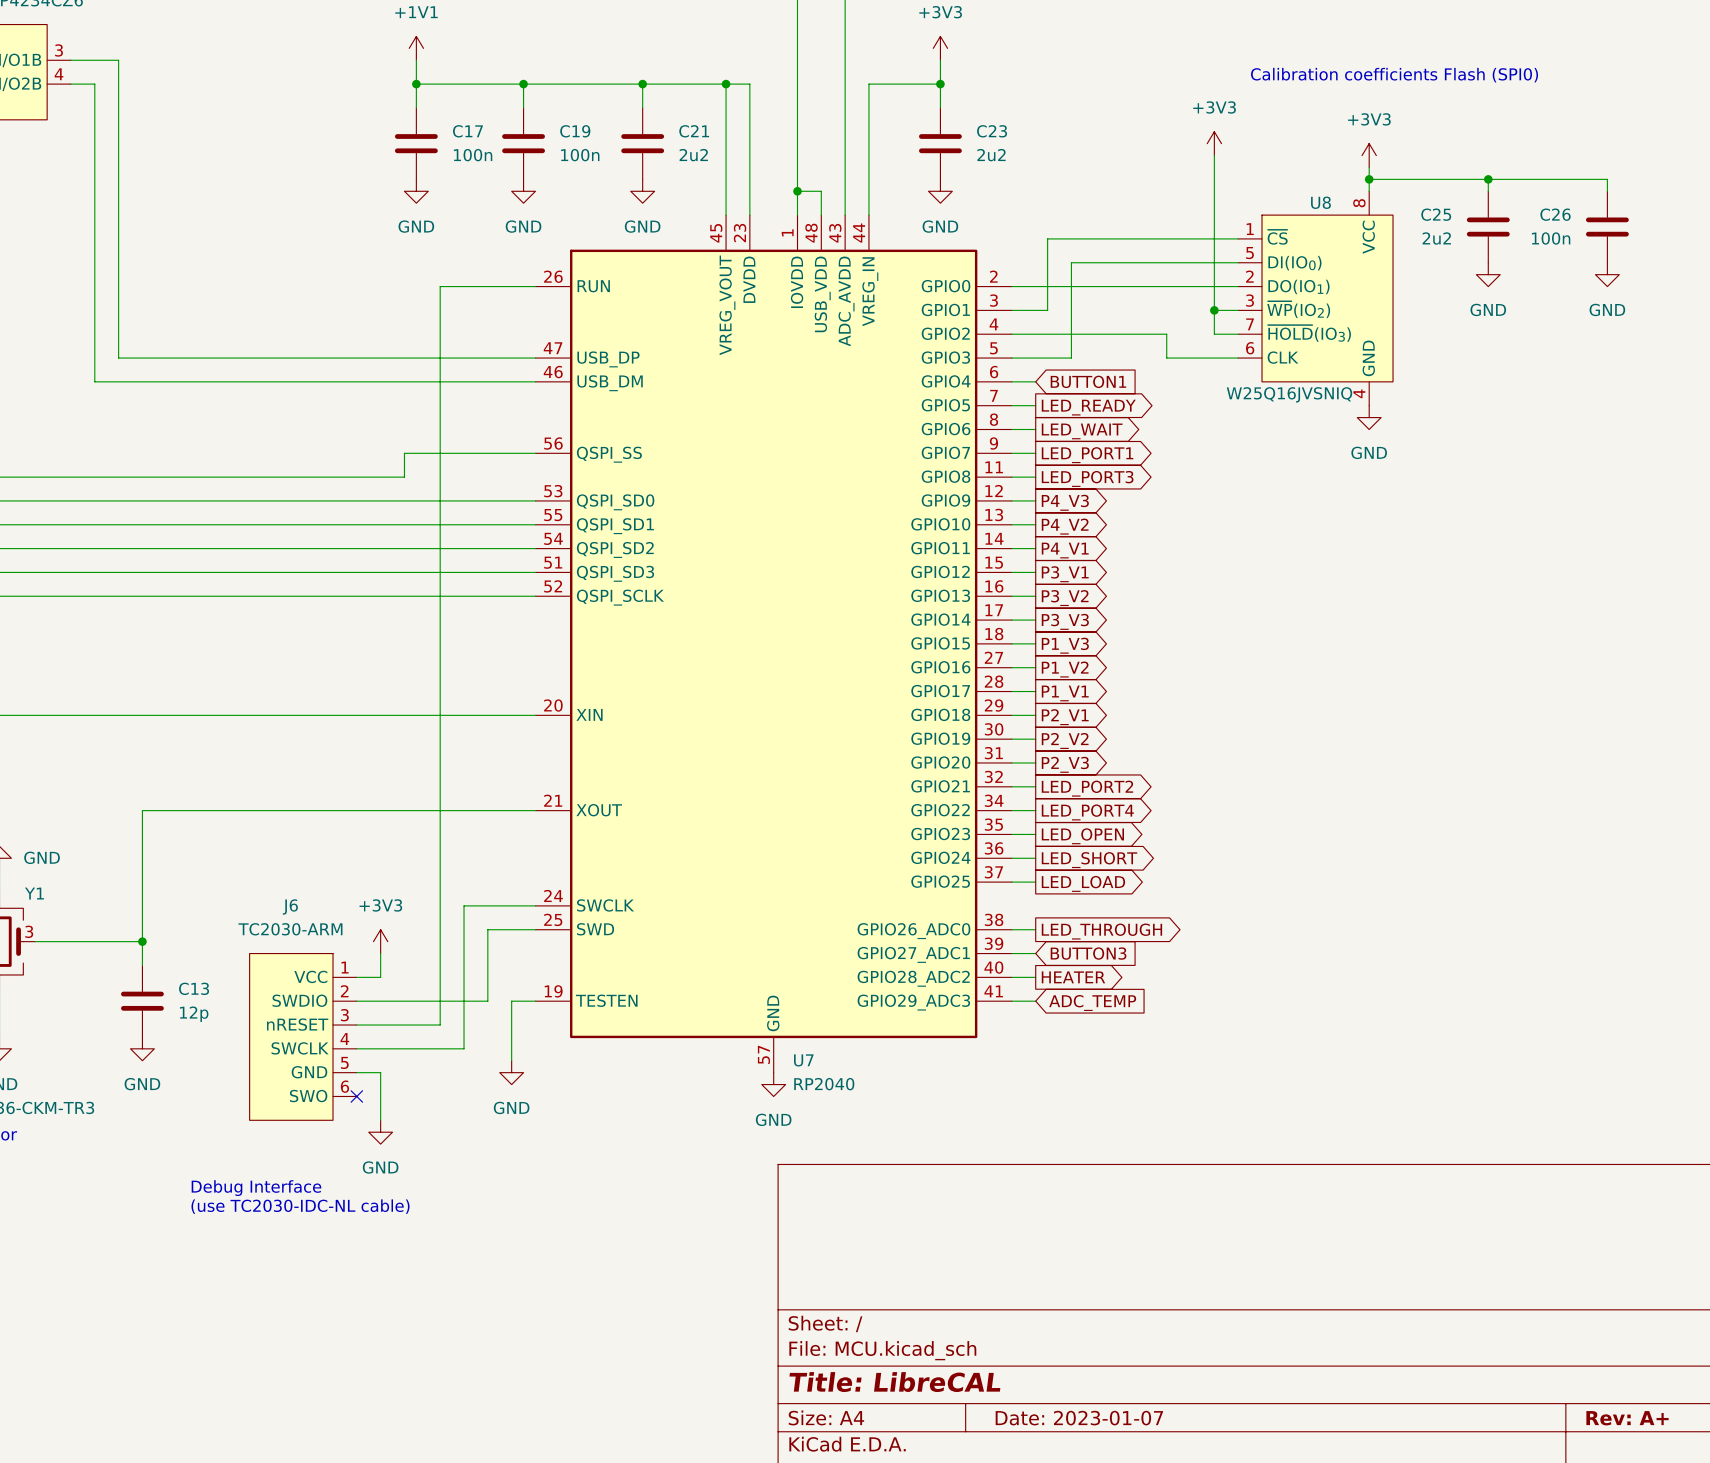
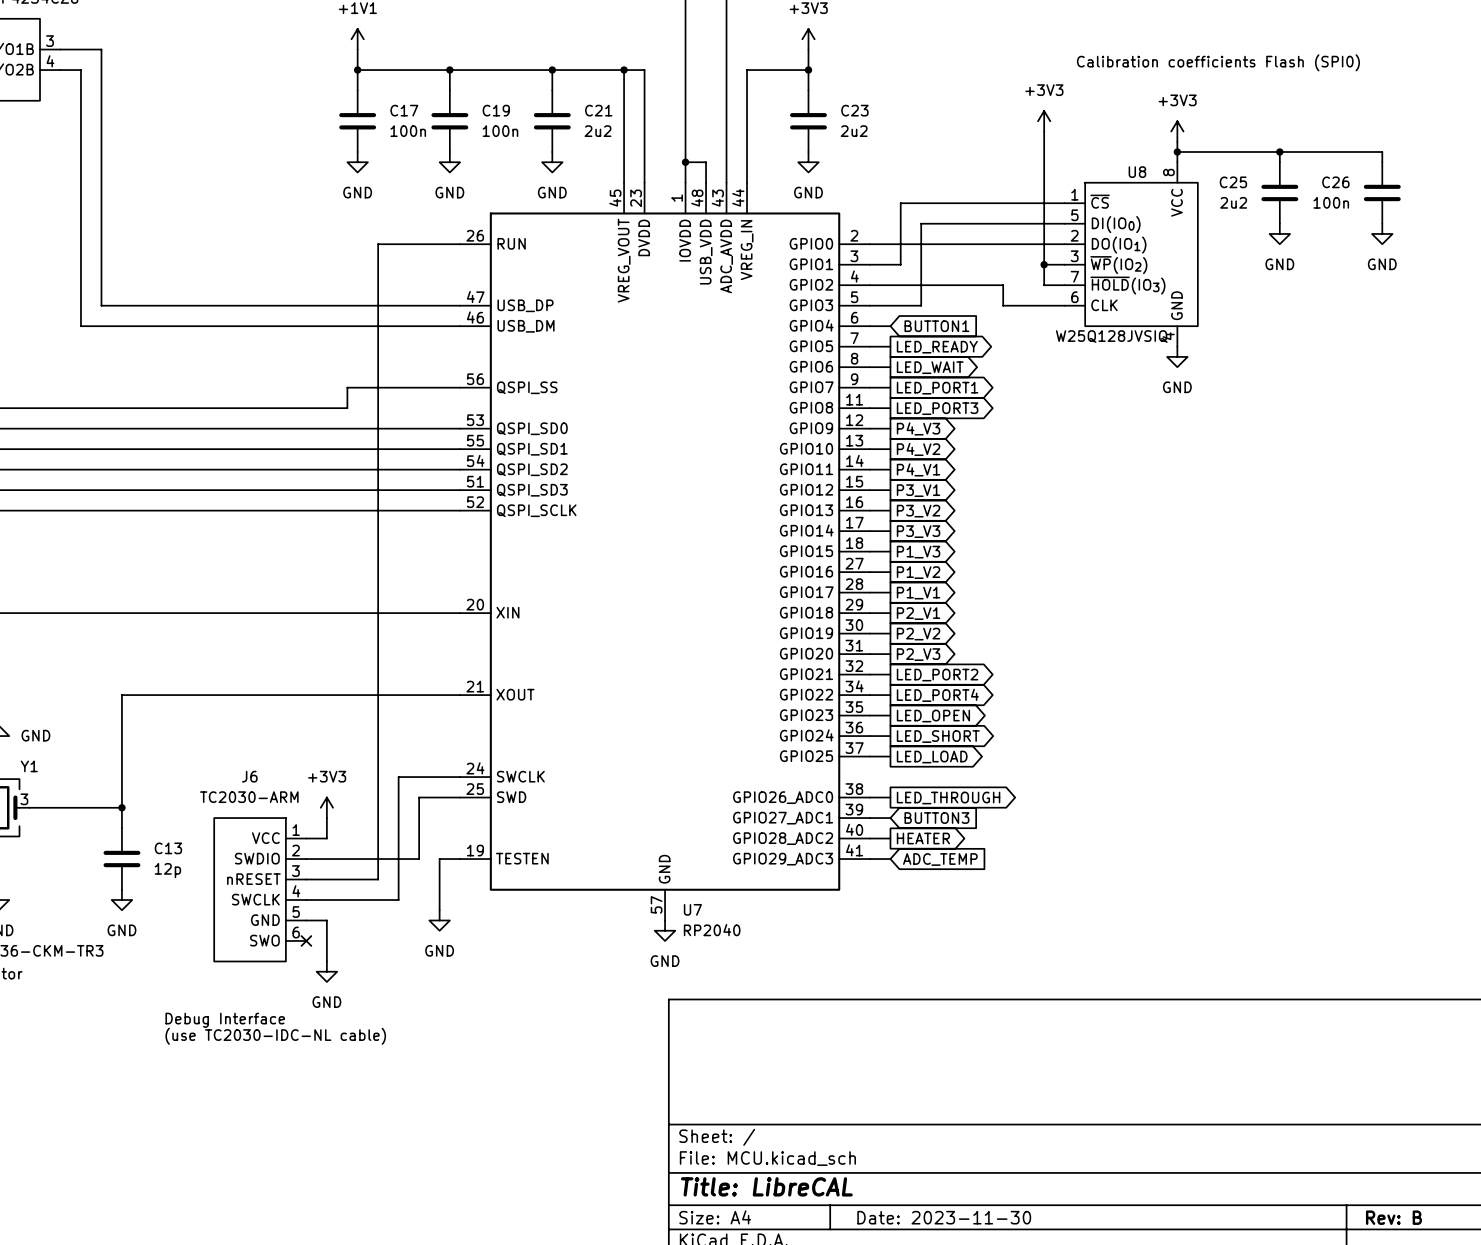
U8 value: W25Q16JVSNIQ (1289, 394) -> W25Q128JVSIQ (1111, 336)
title block: Date: 2023-01-07 (1079, 1418) -> Date: 2023-11-30 (944, 1217)
title block: Rev: A+ (1627, 1418) -> Rev: B (1393, 1217)

